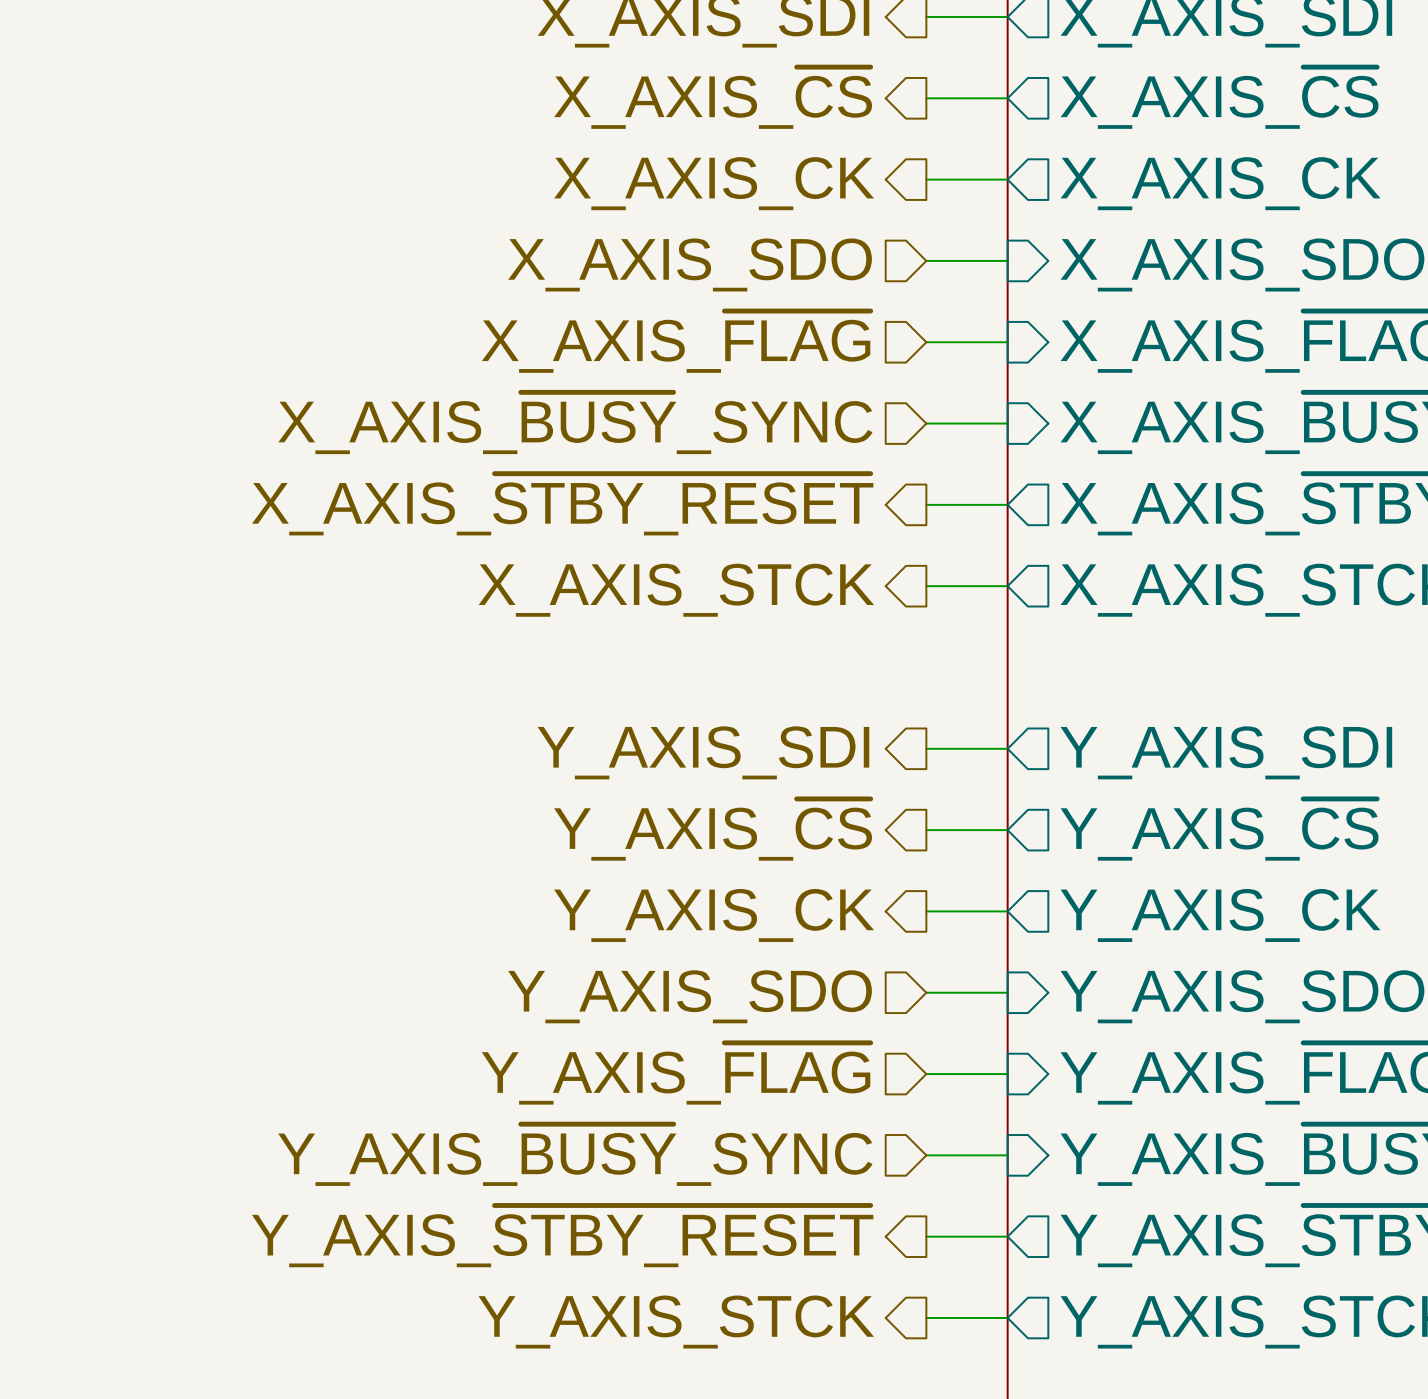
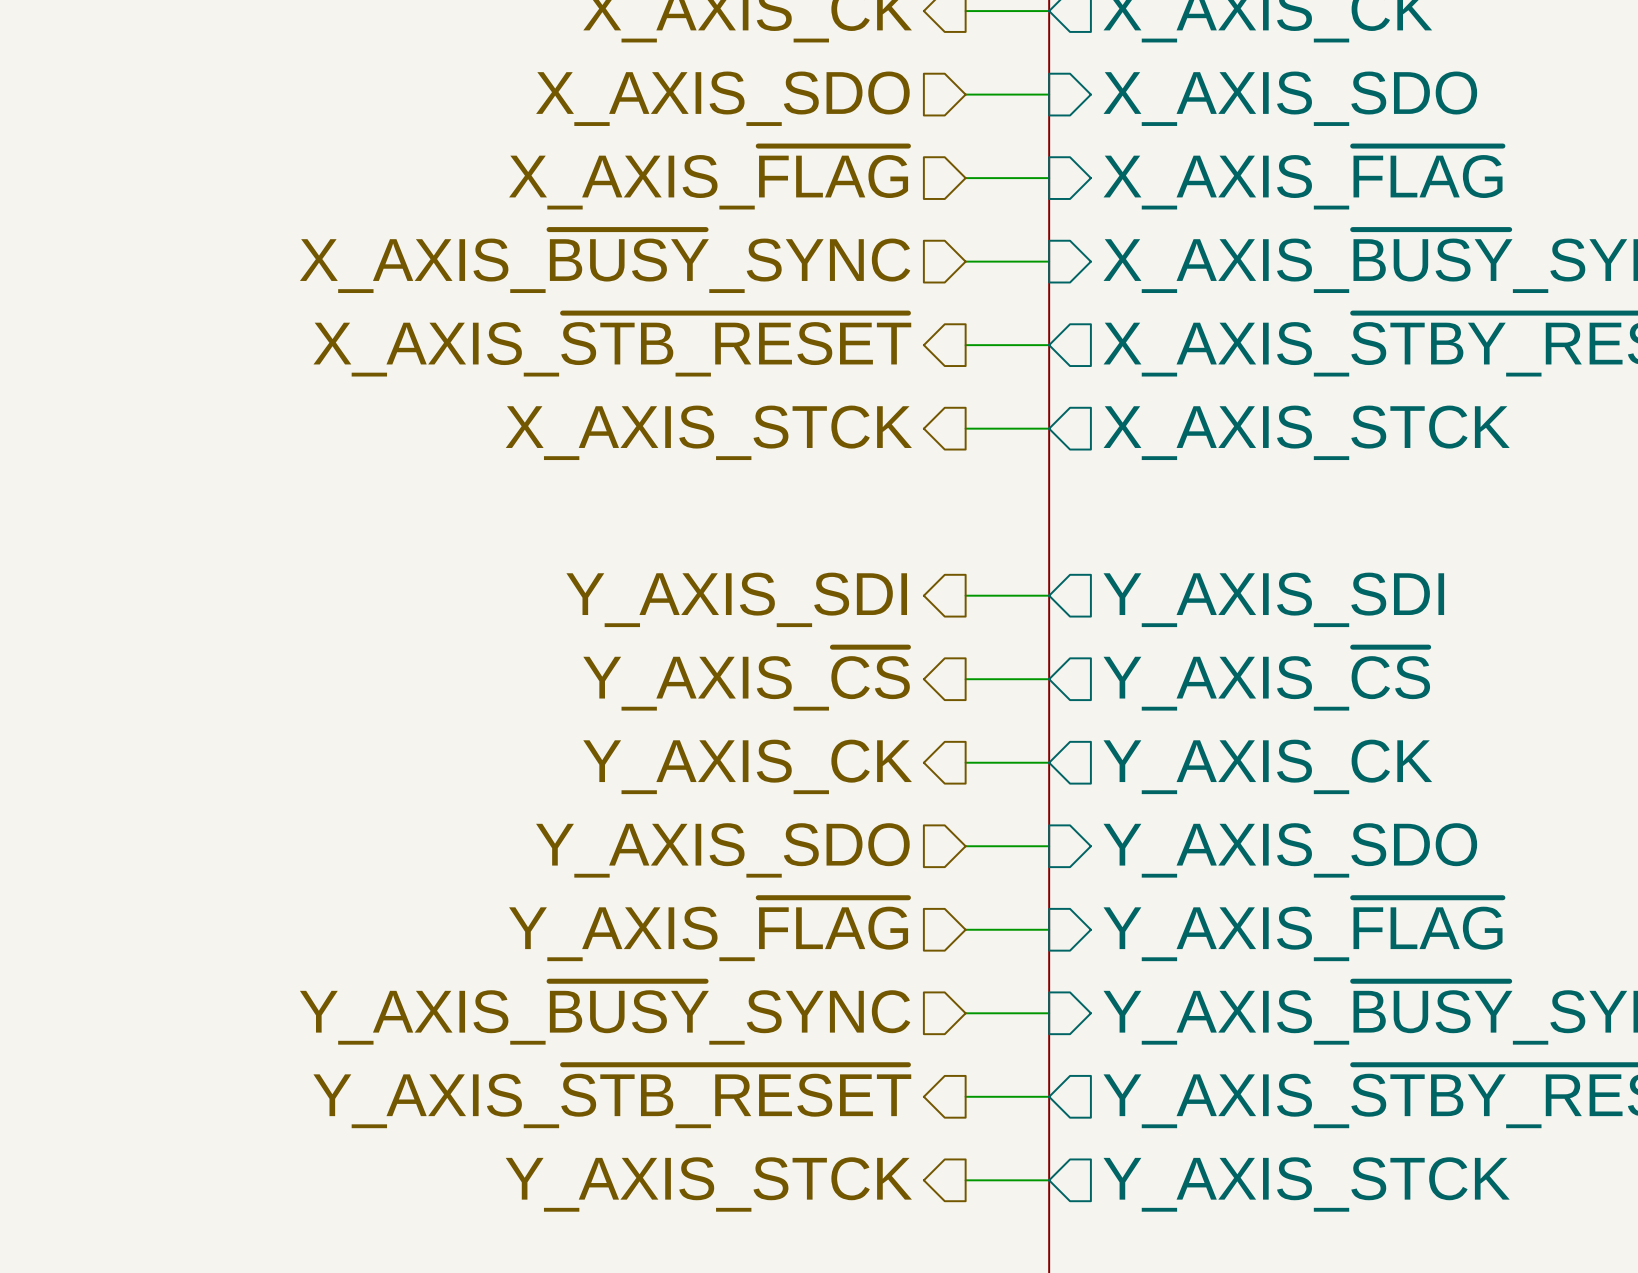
hierarchical label: X_AXIS_~{STBY_RESET} (562, 504) -> X_AXIS_~{STB_RESET} (612, 344)
hierarchical label: Y_AXIS_~{STBY_RESET} (562, 1236) -> Y_AXIS_~{STB_RESET} (612, 1096)

